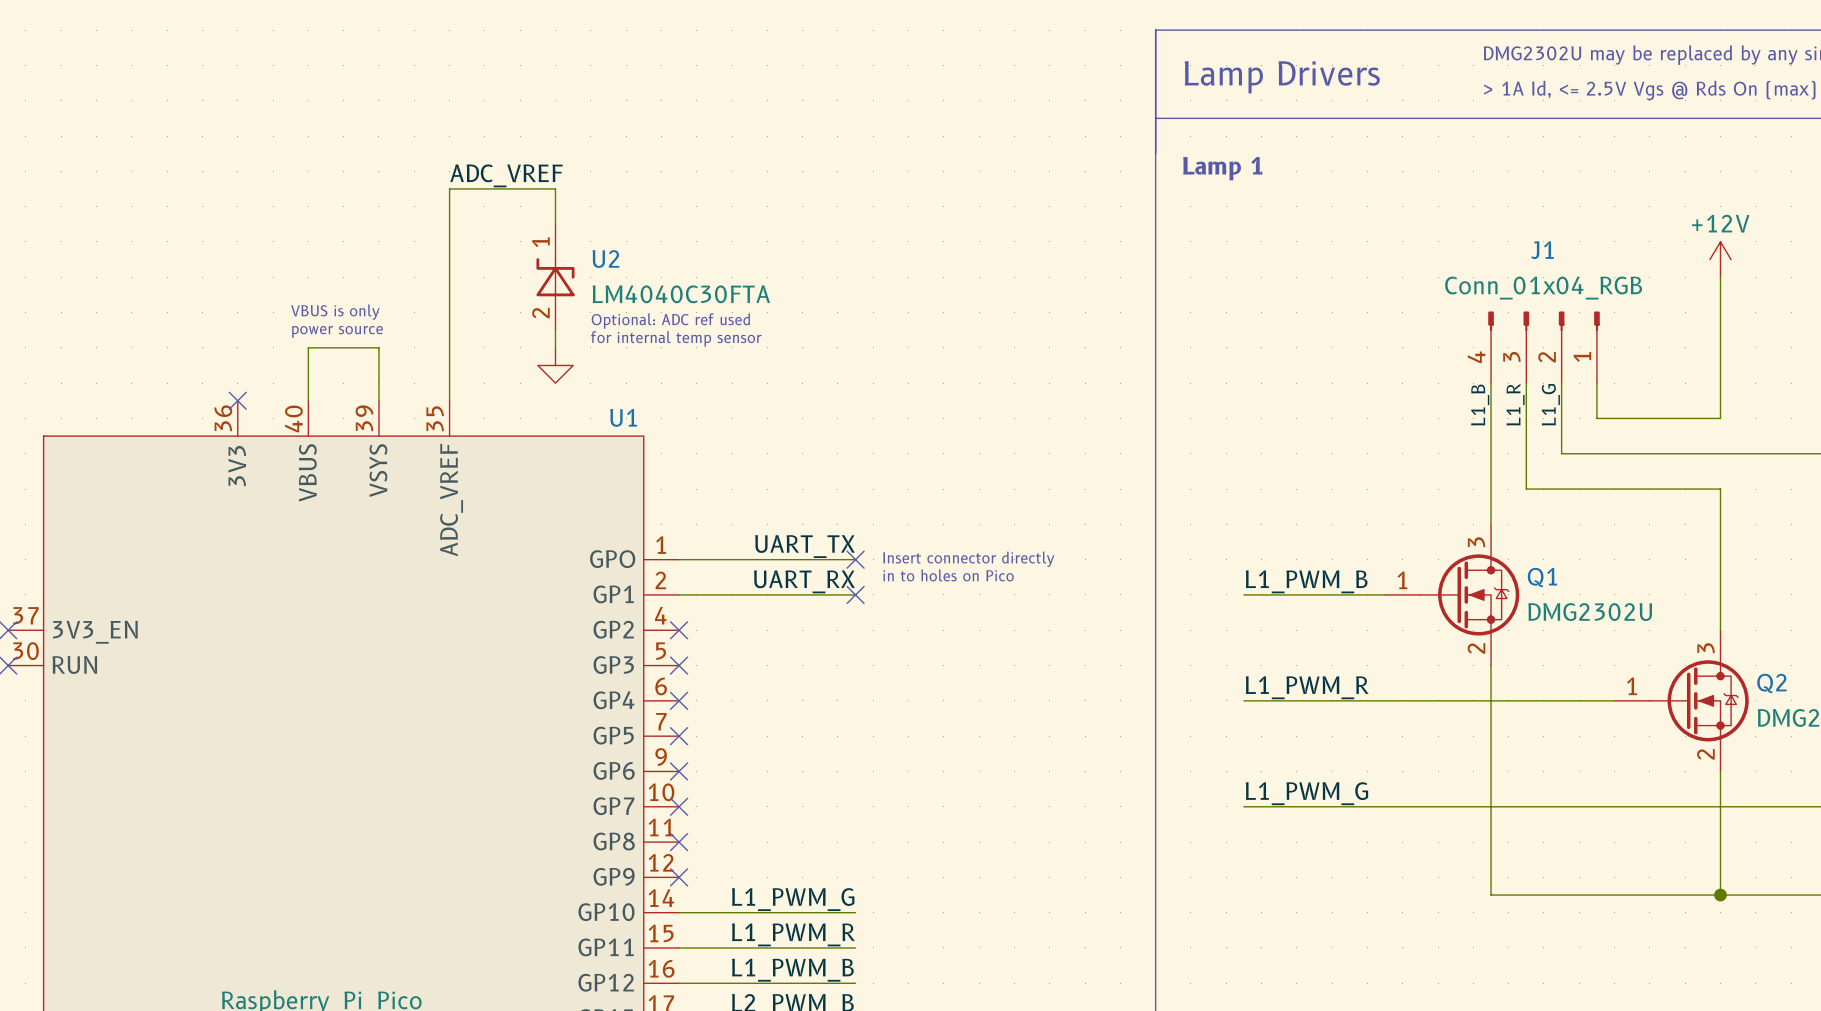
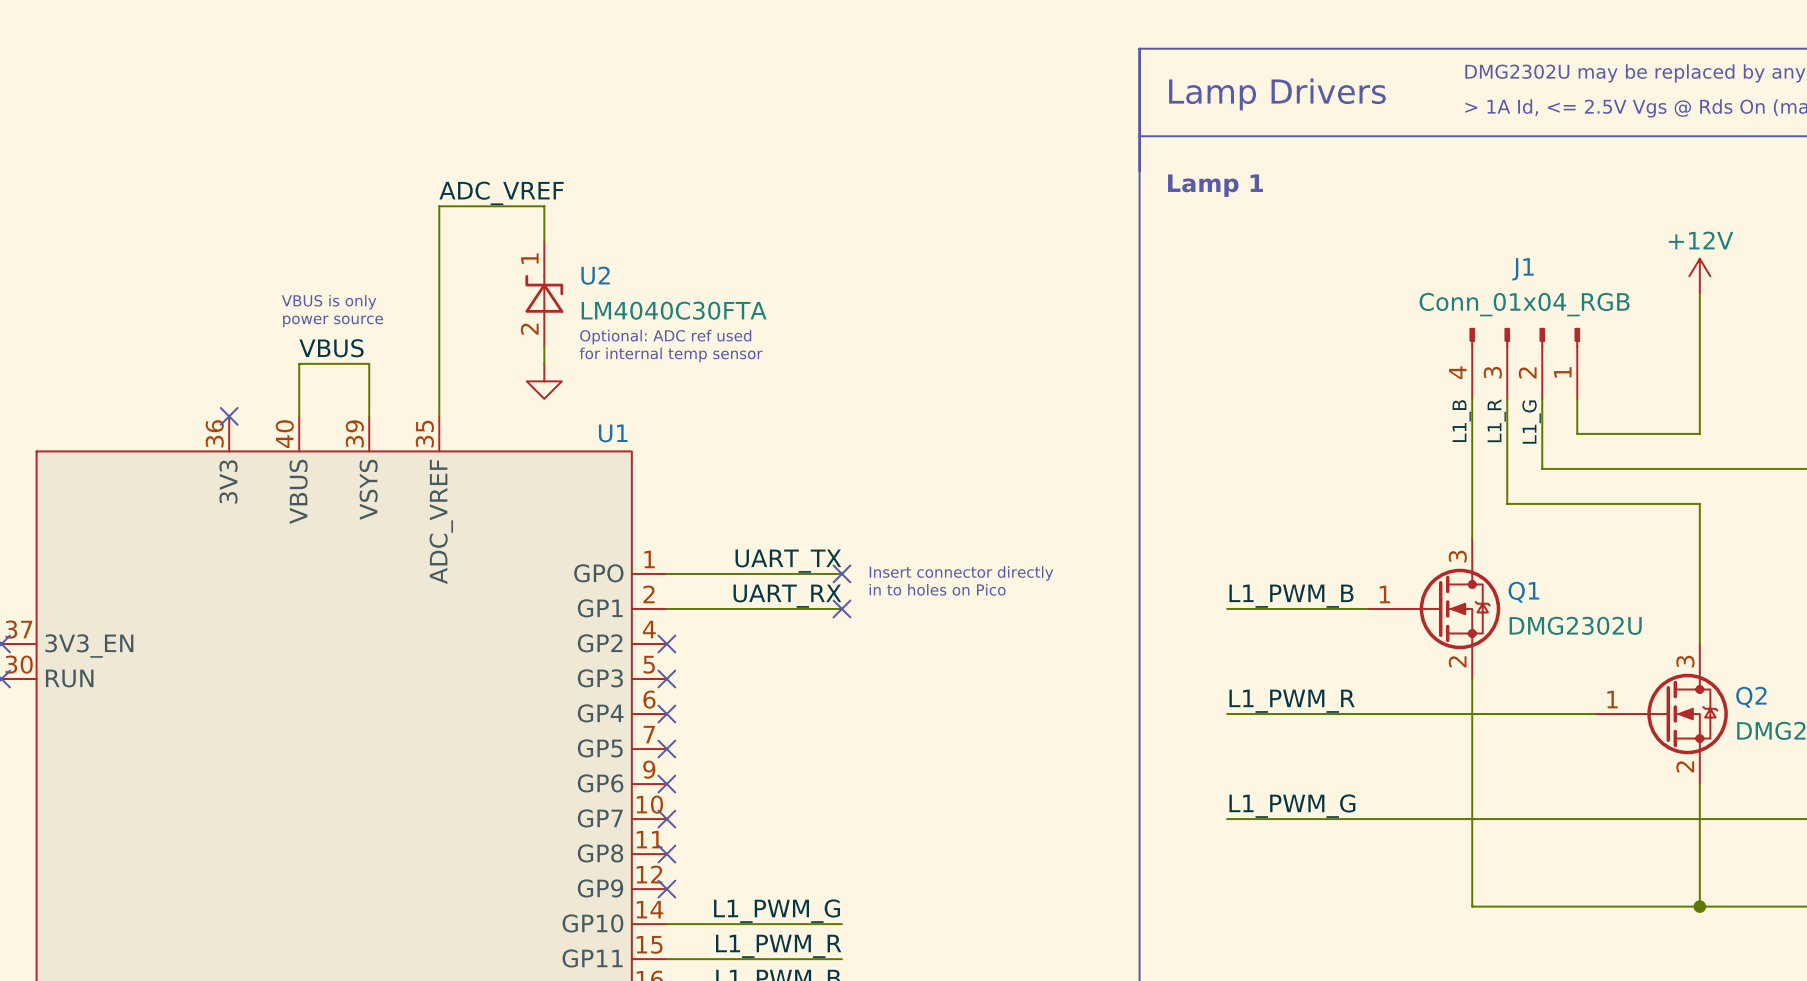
text: none -> VBUS is only (329, 302)
text: VBUS is only (335, 312) -> power source (333, 321)
text: power source (337, 331) -> none
label: none -> VBUS (331, 348)

